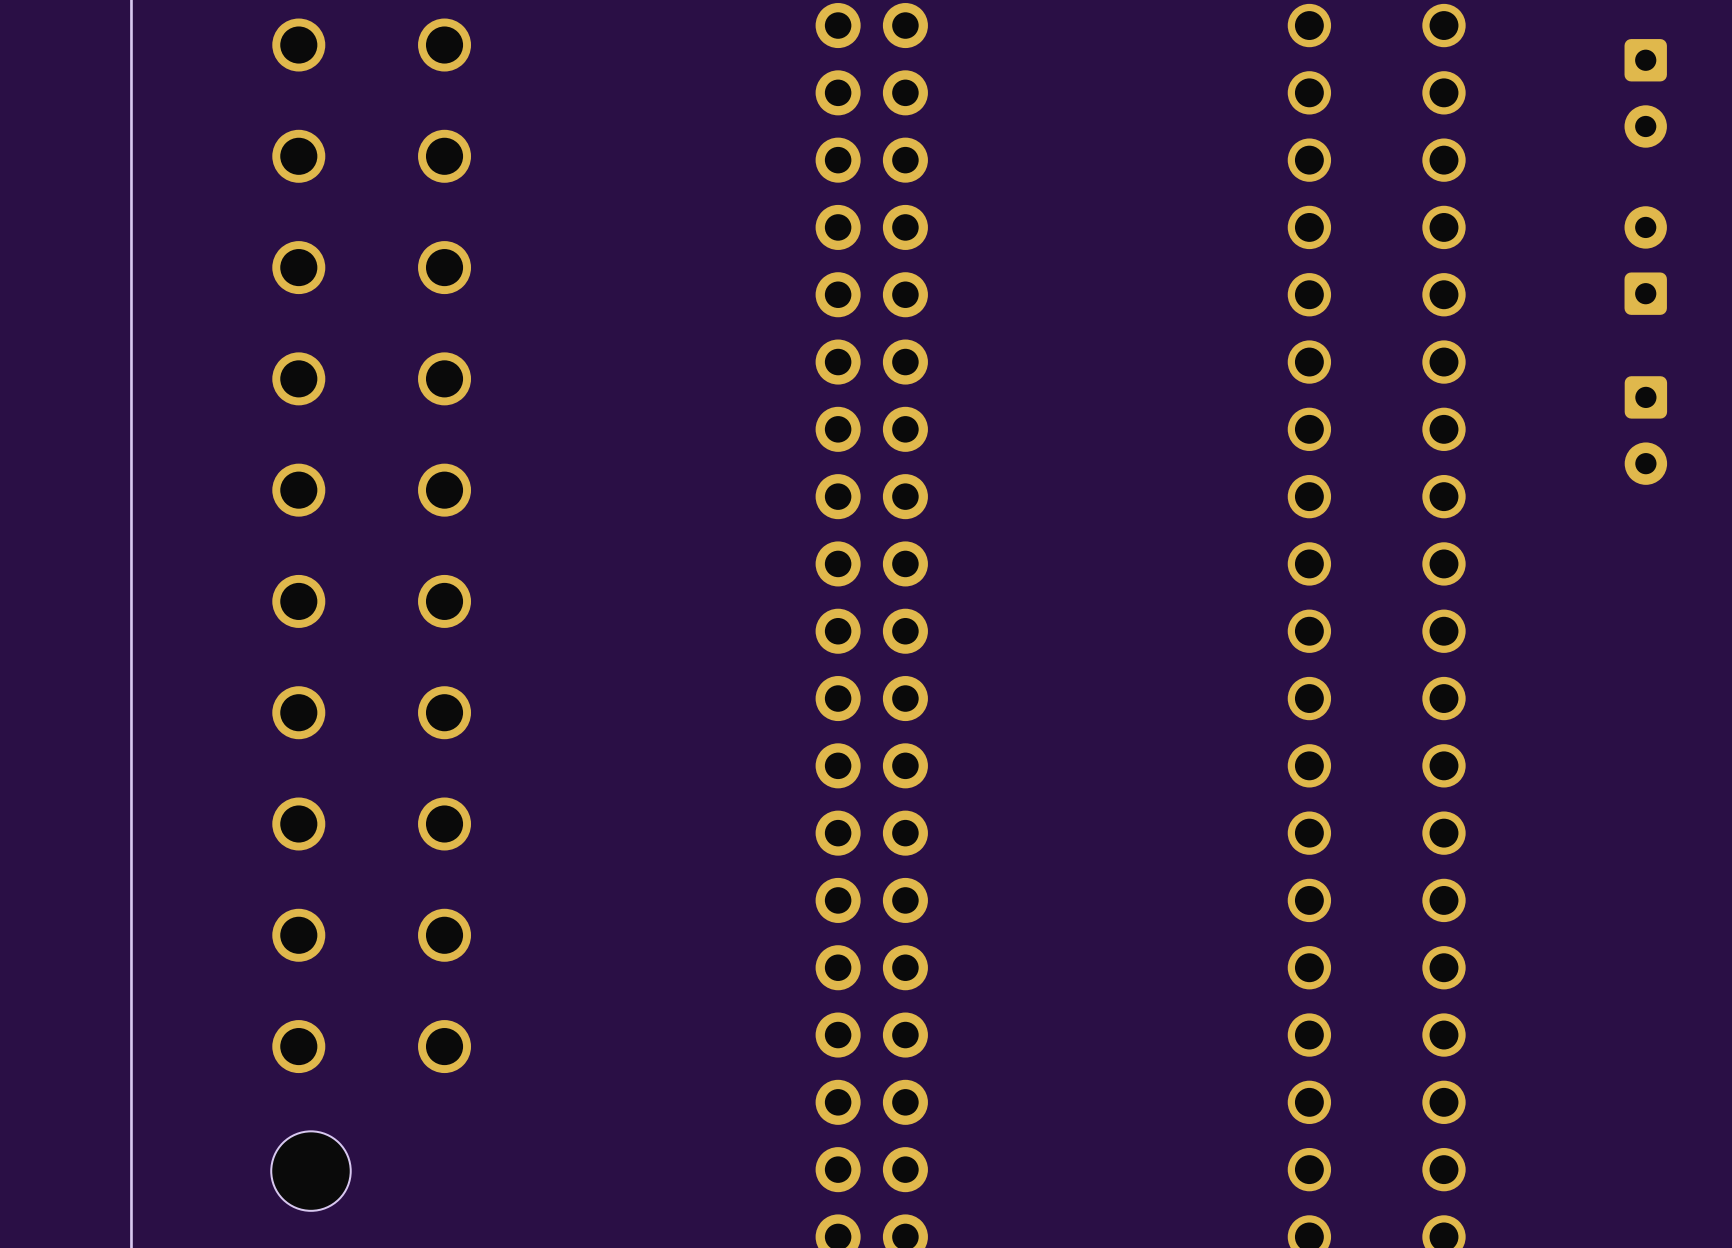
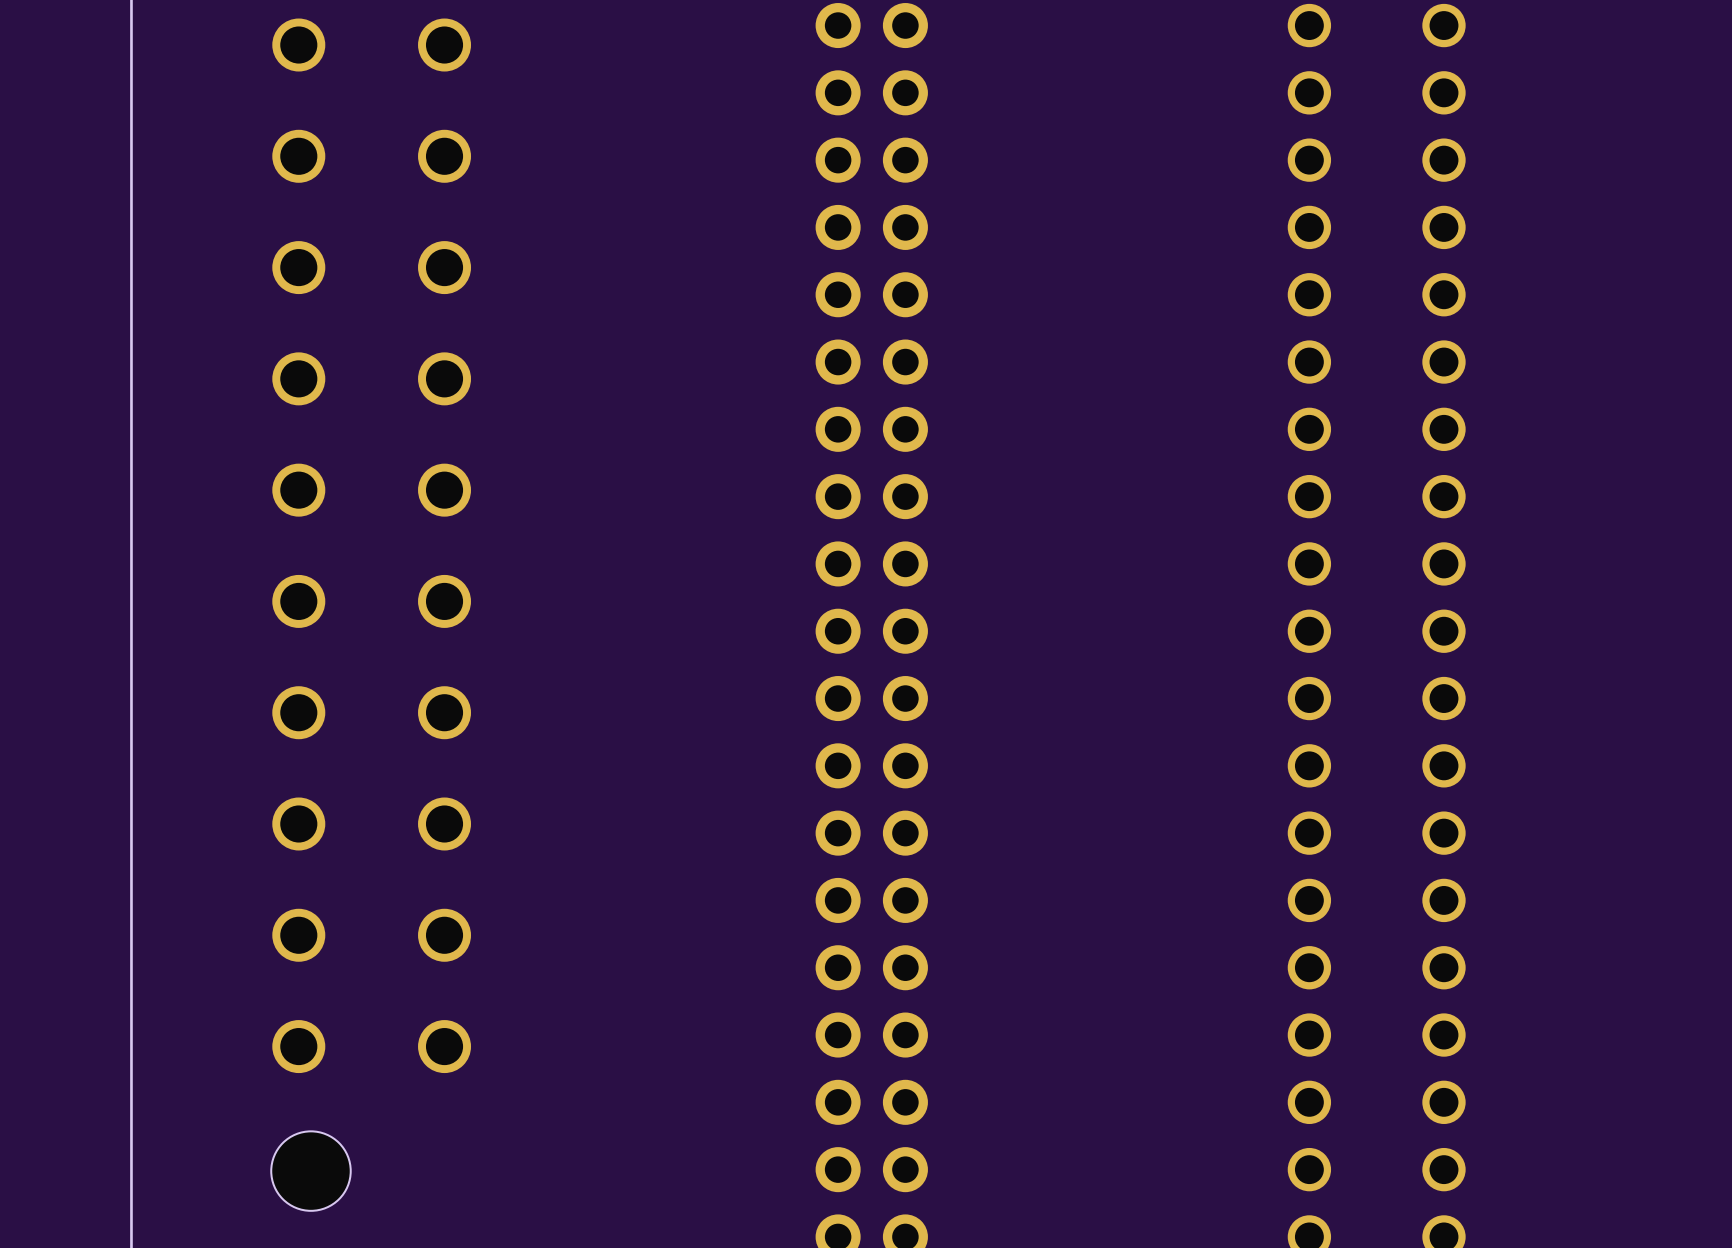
part: (1645, 93) -> none
part: (1645, 260) -> none
part: (1645, 430) -> none

